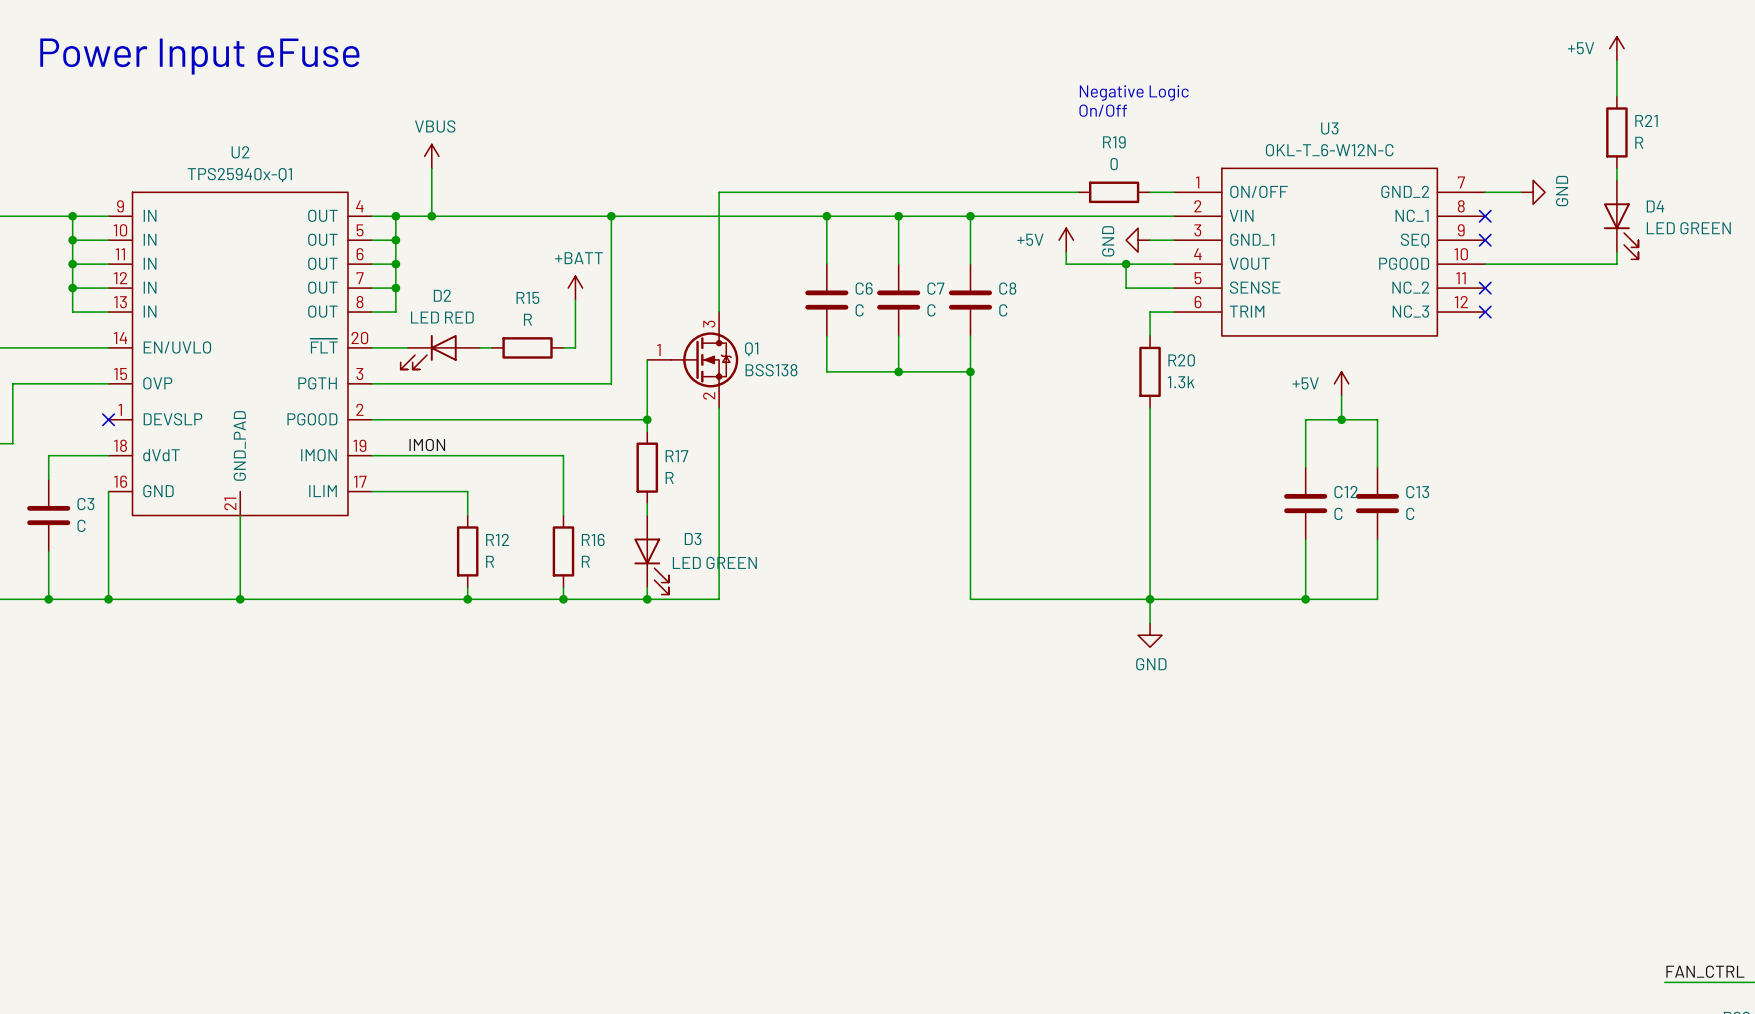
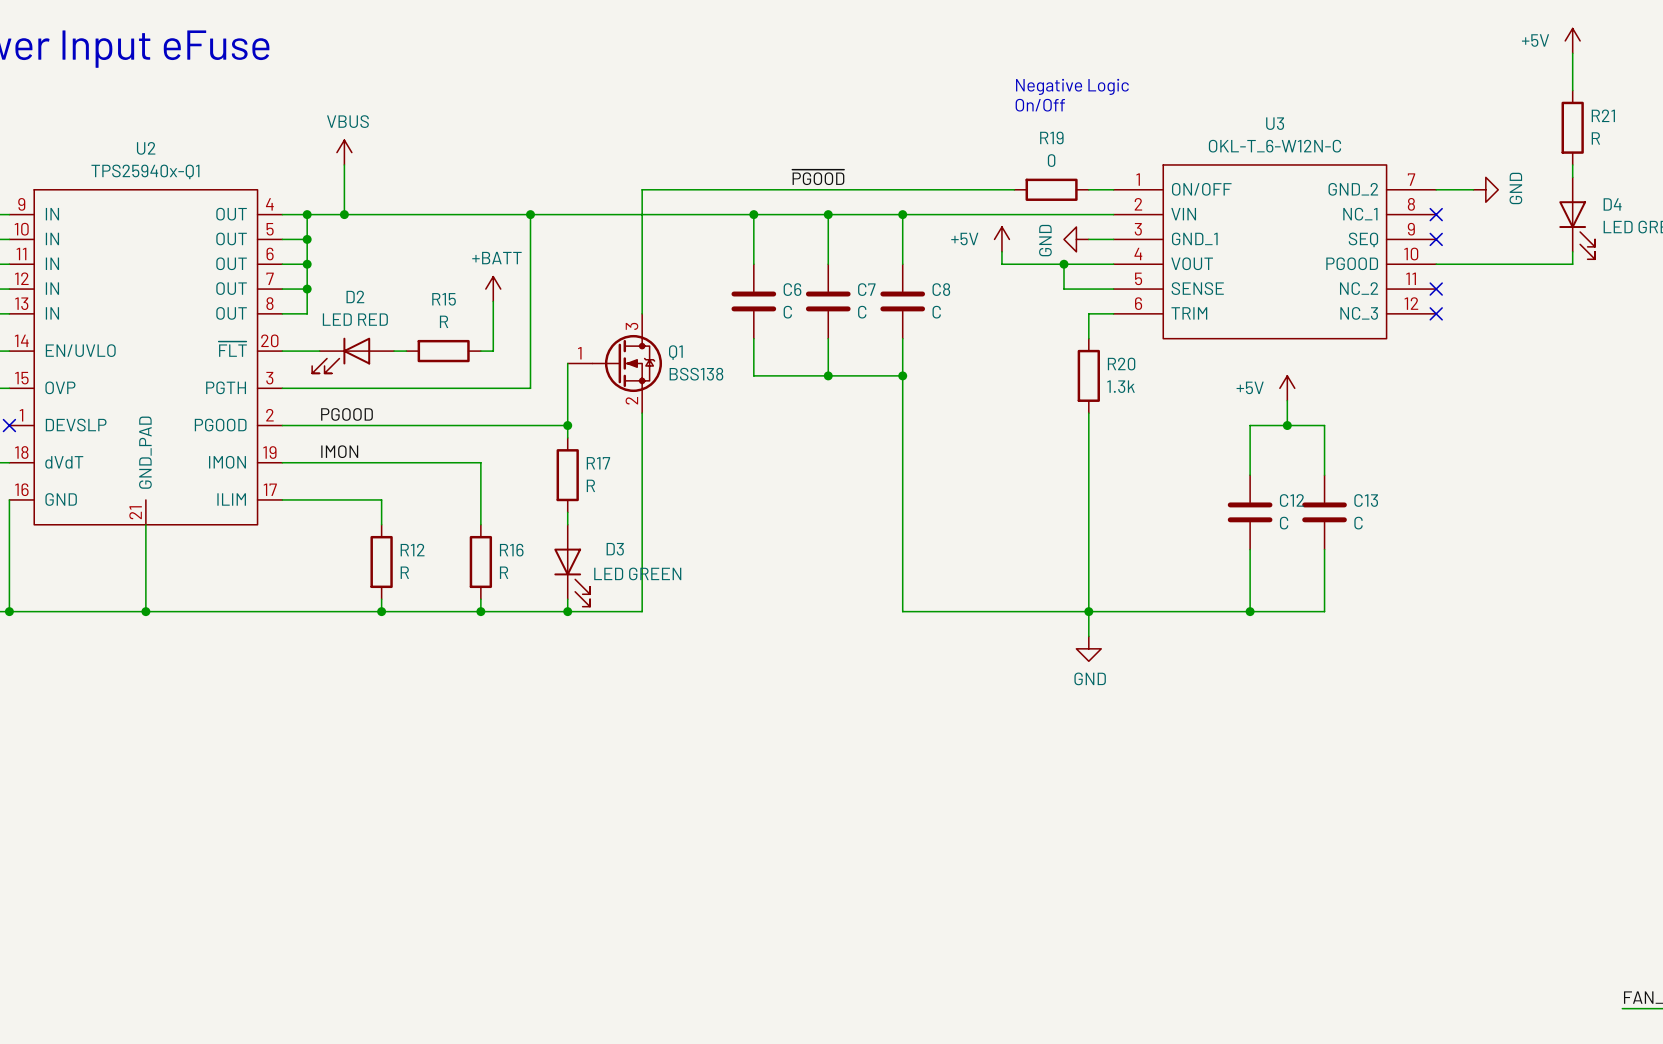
label: none -> ~{PGOOD} (818, 177)
label: none -> PGOOD (346, 414)

